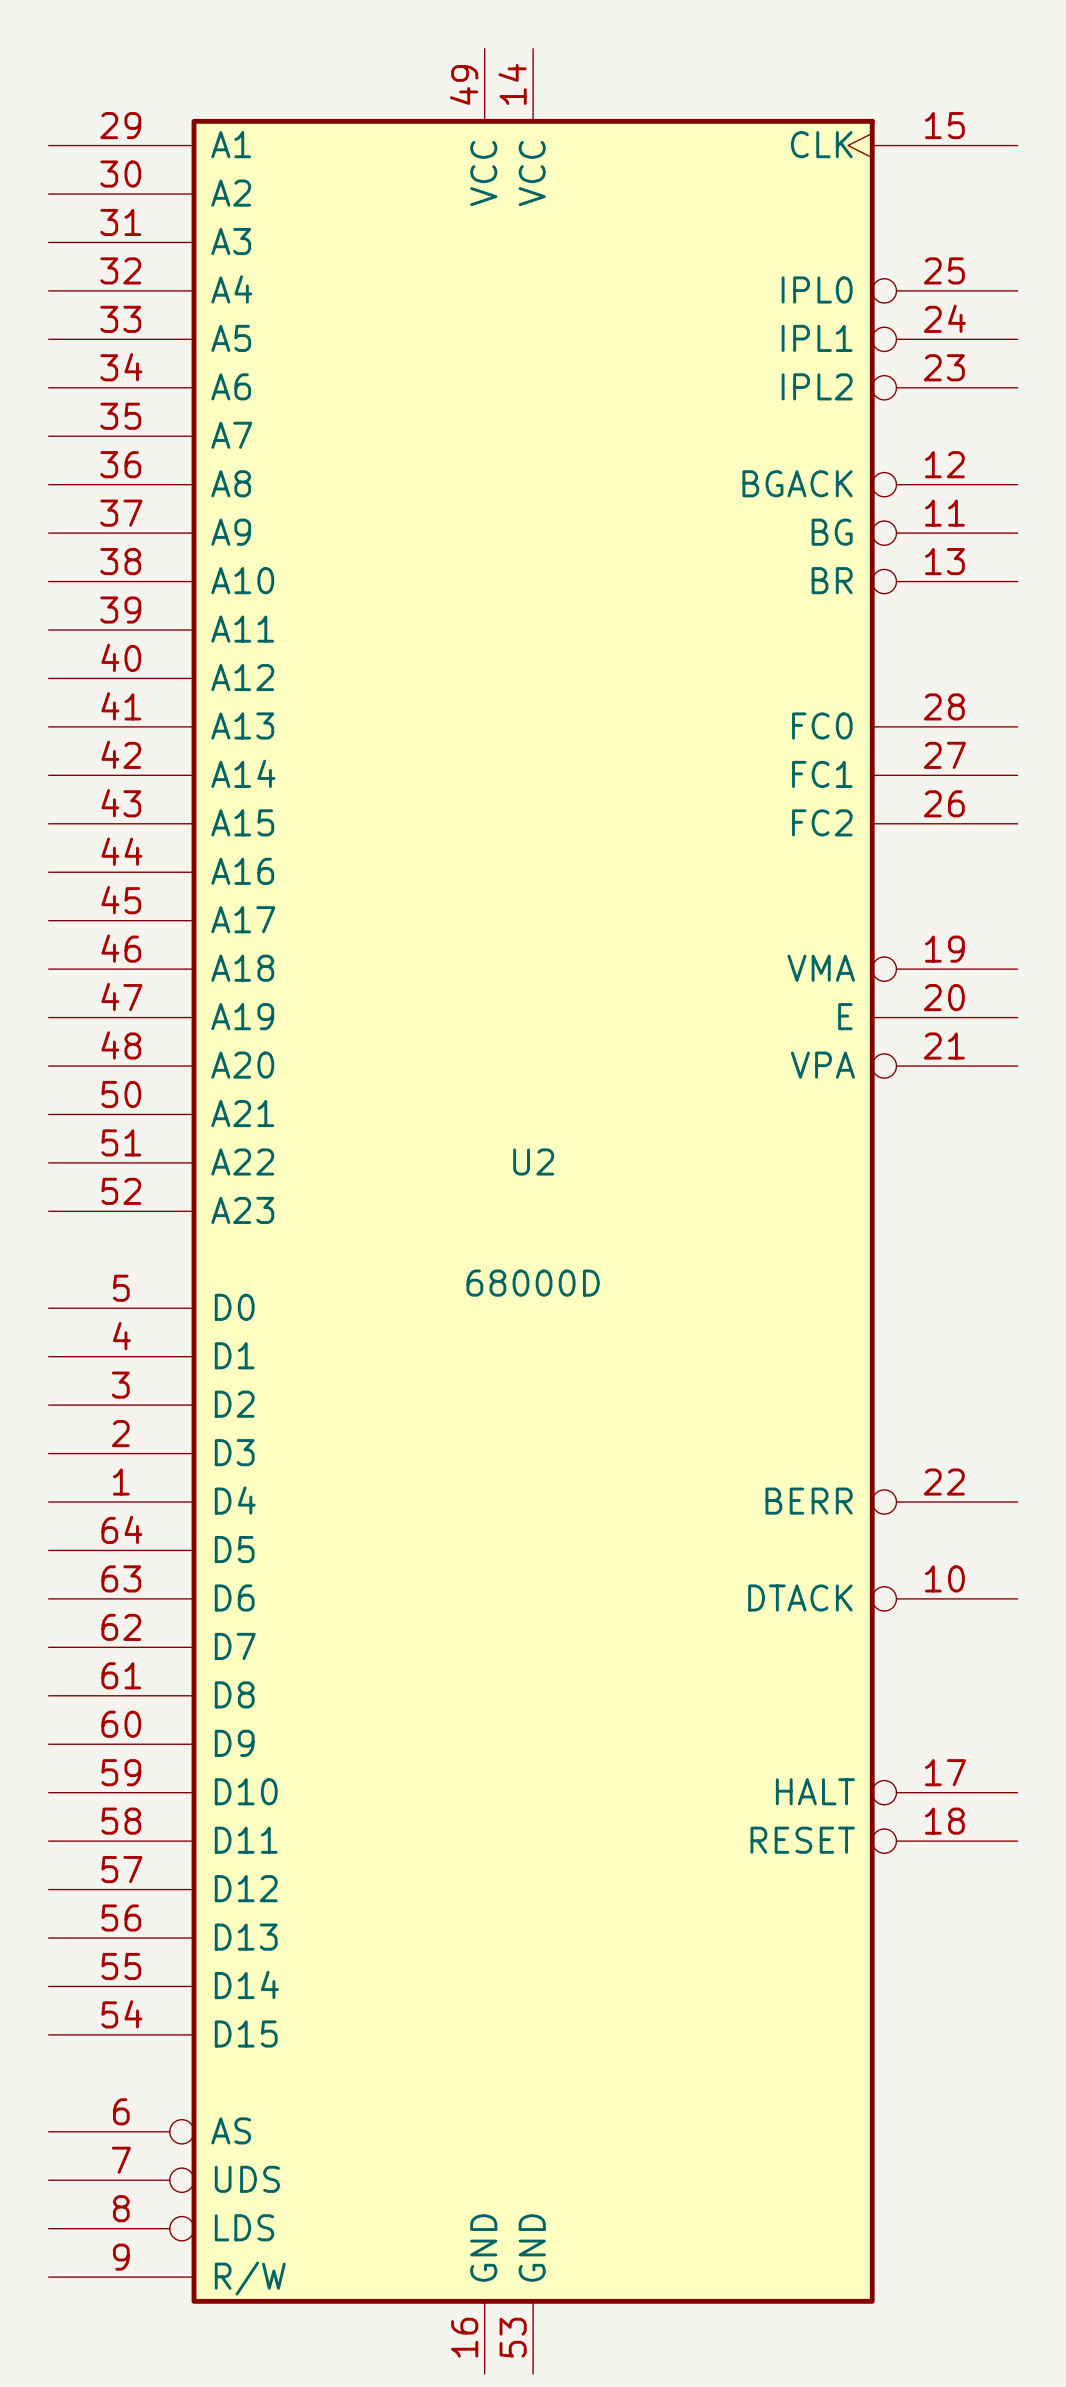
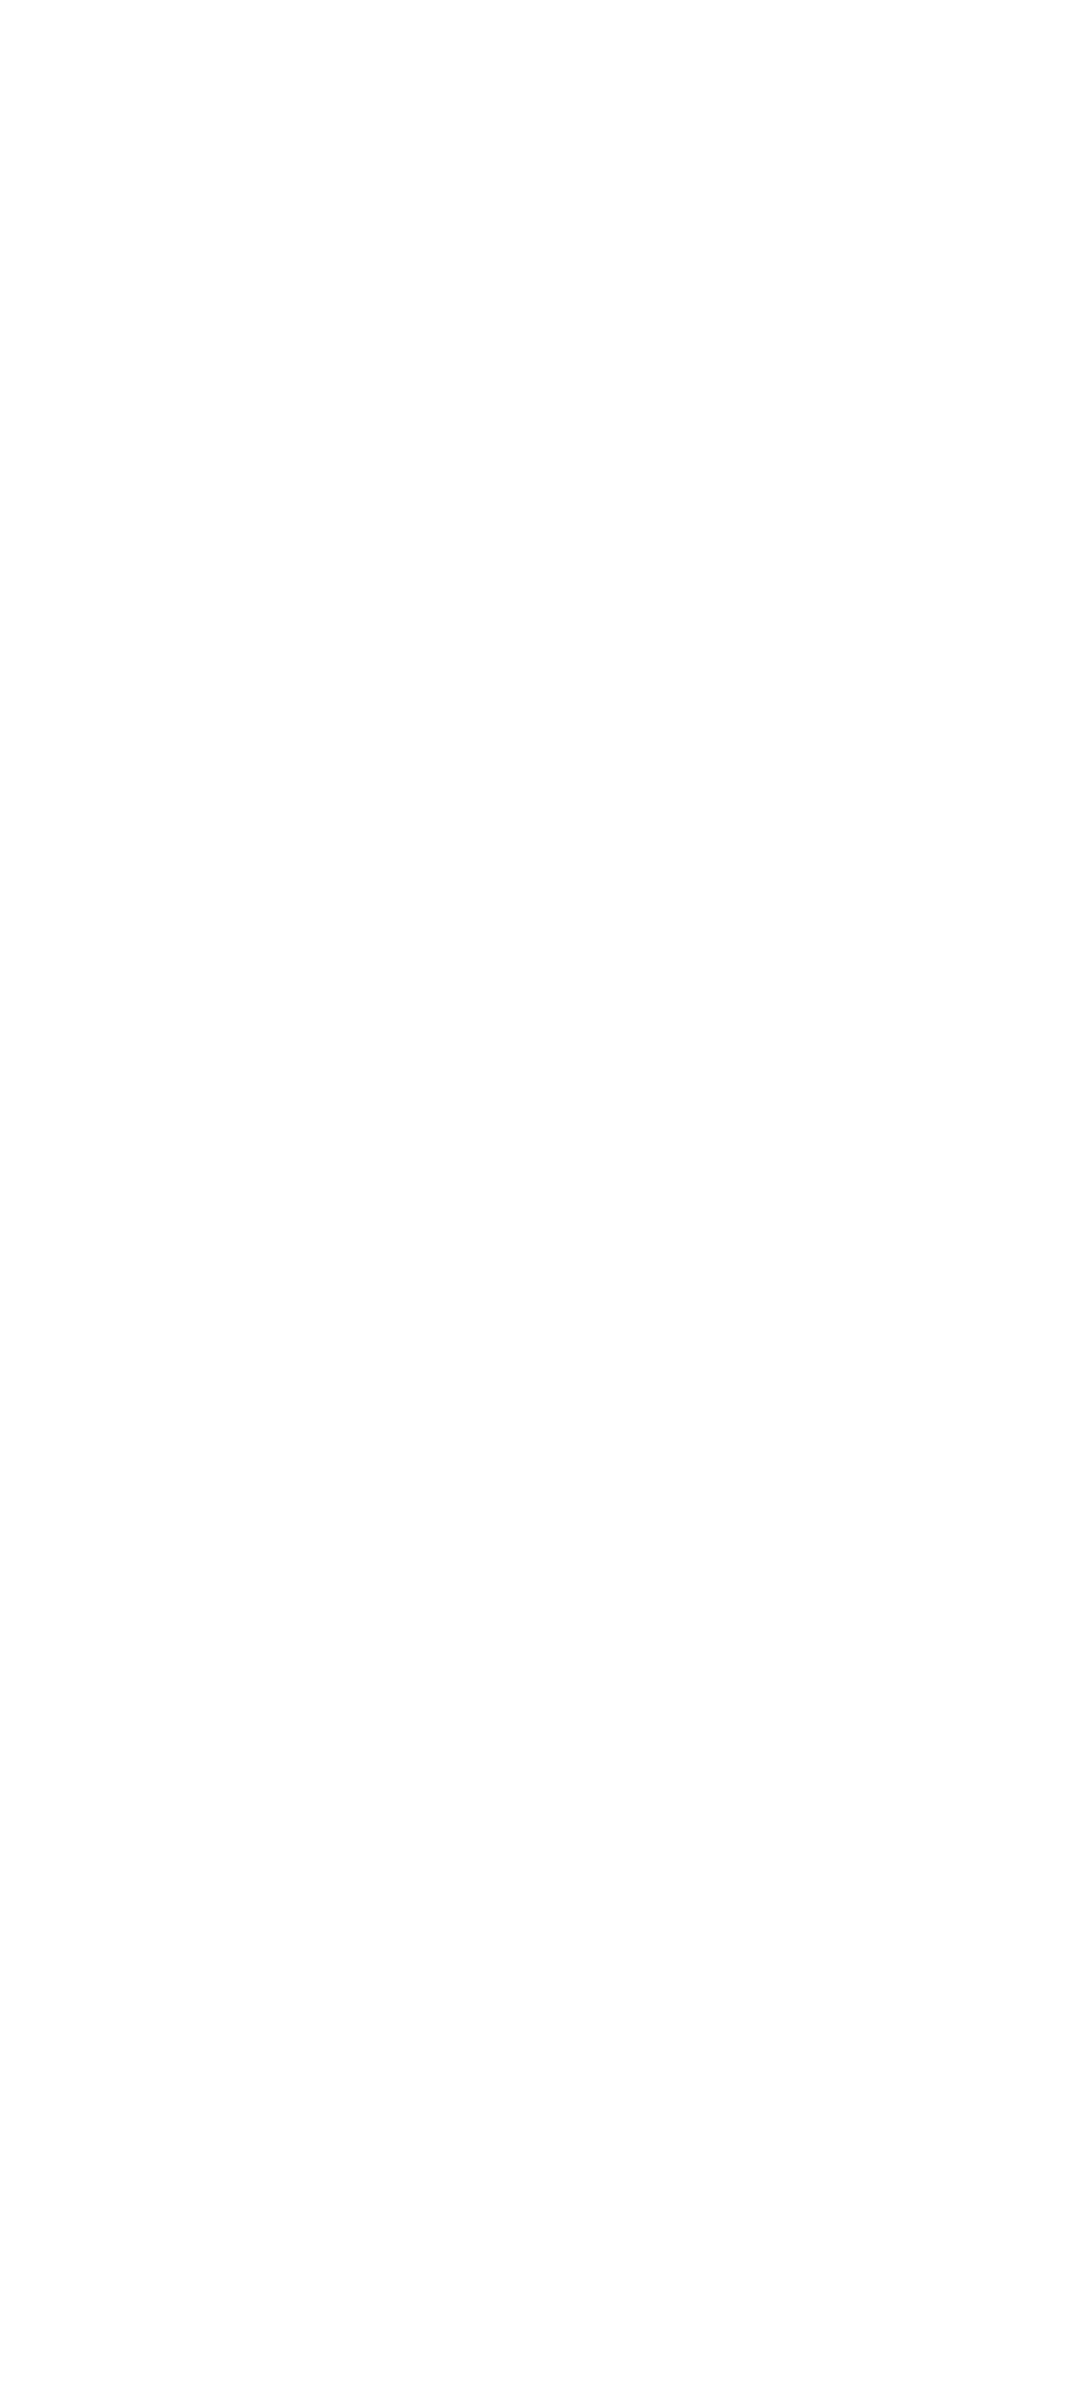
U2: 68000D (533, 1211) -> none

